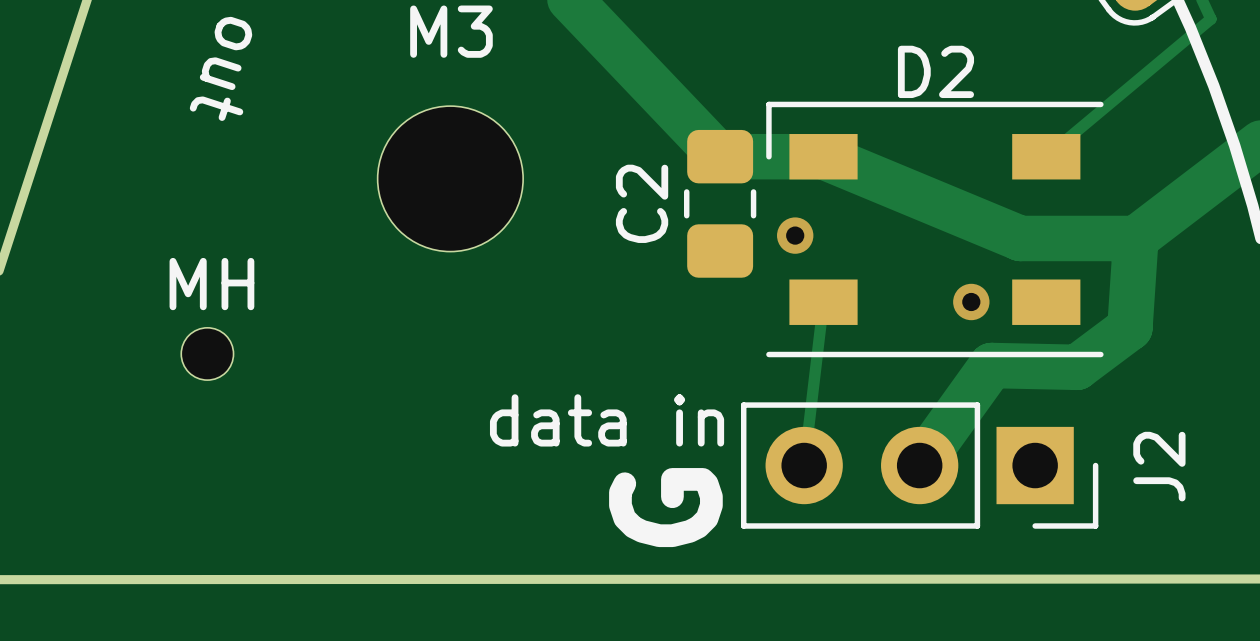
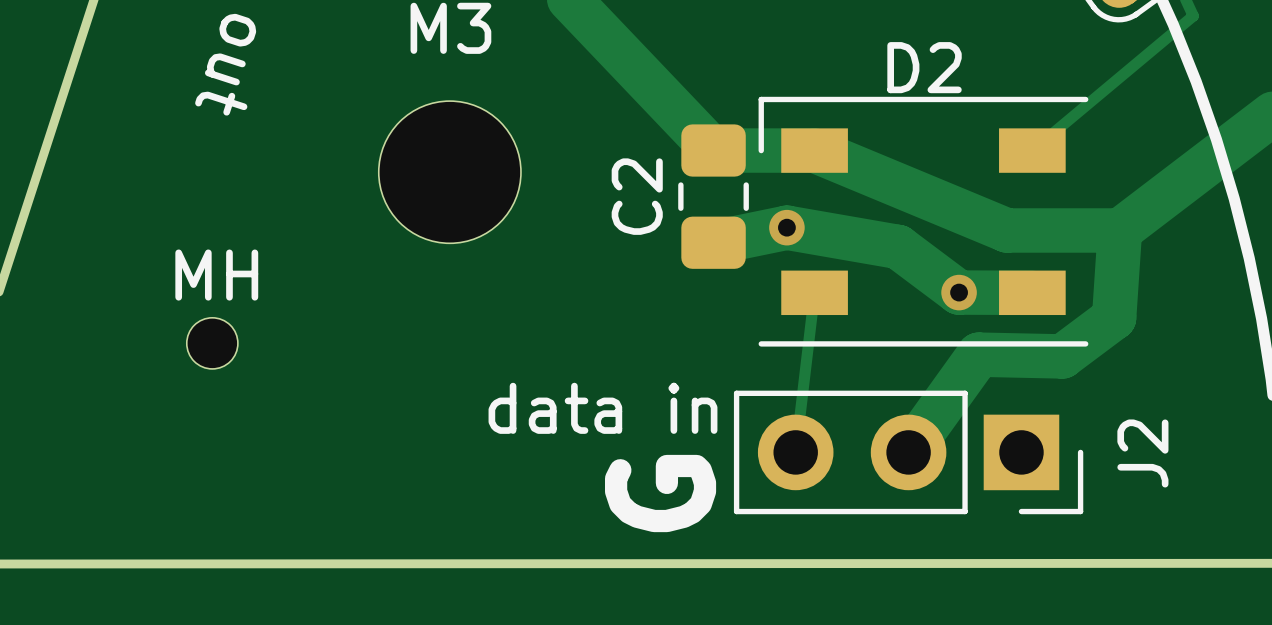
track: none -> (713, 242) (786, 227) (898, 246) (959, 292) (1032, 292)

